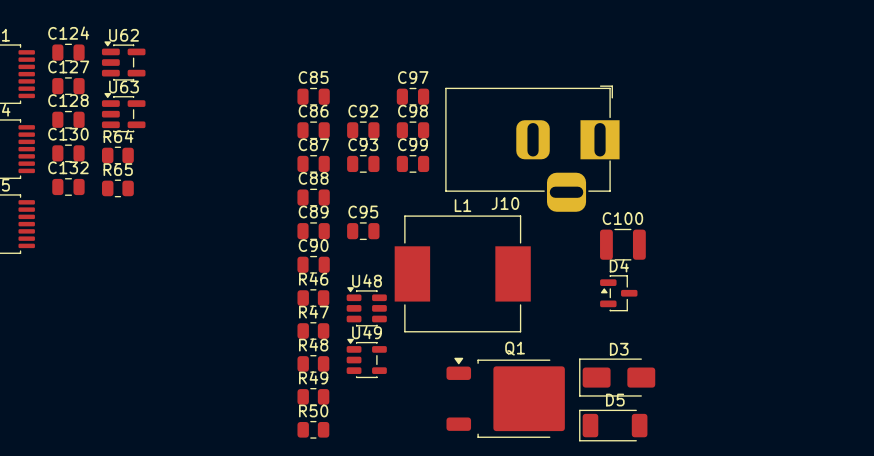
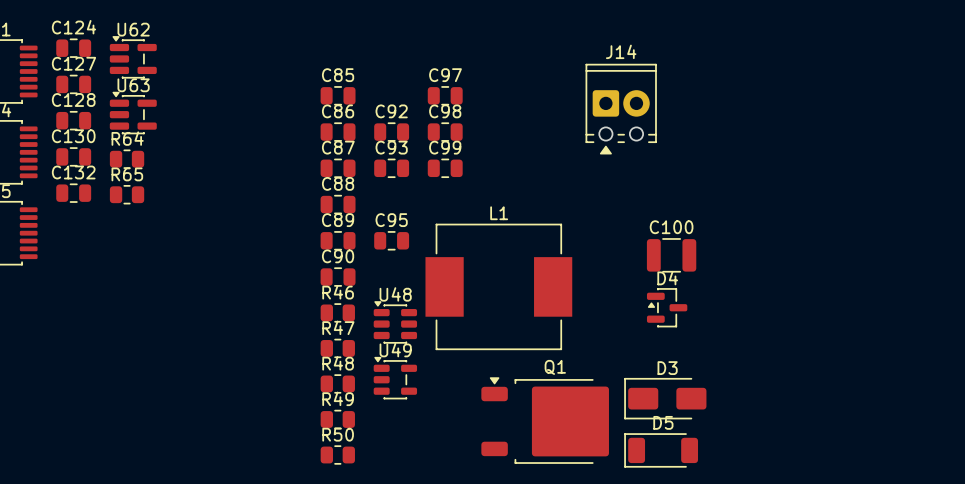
J14: none -> (621, 109)
J10: (532, 148) -> none

